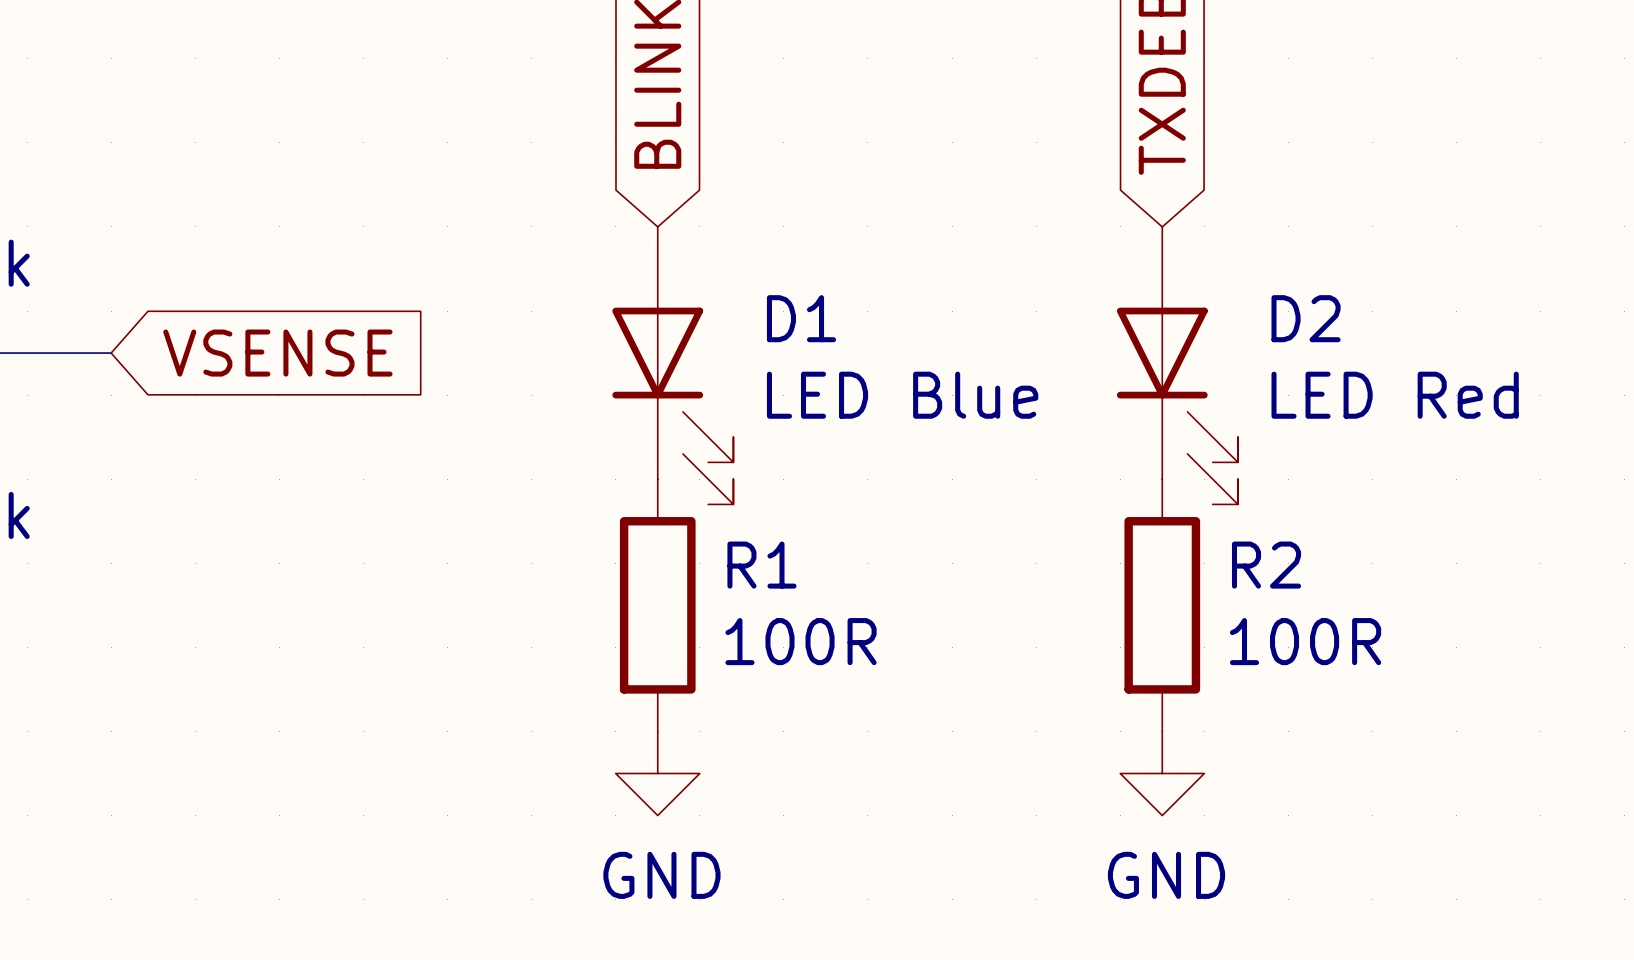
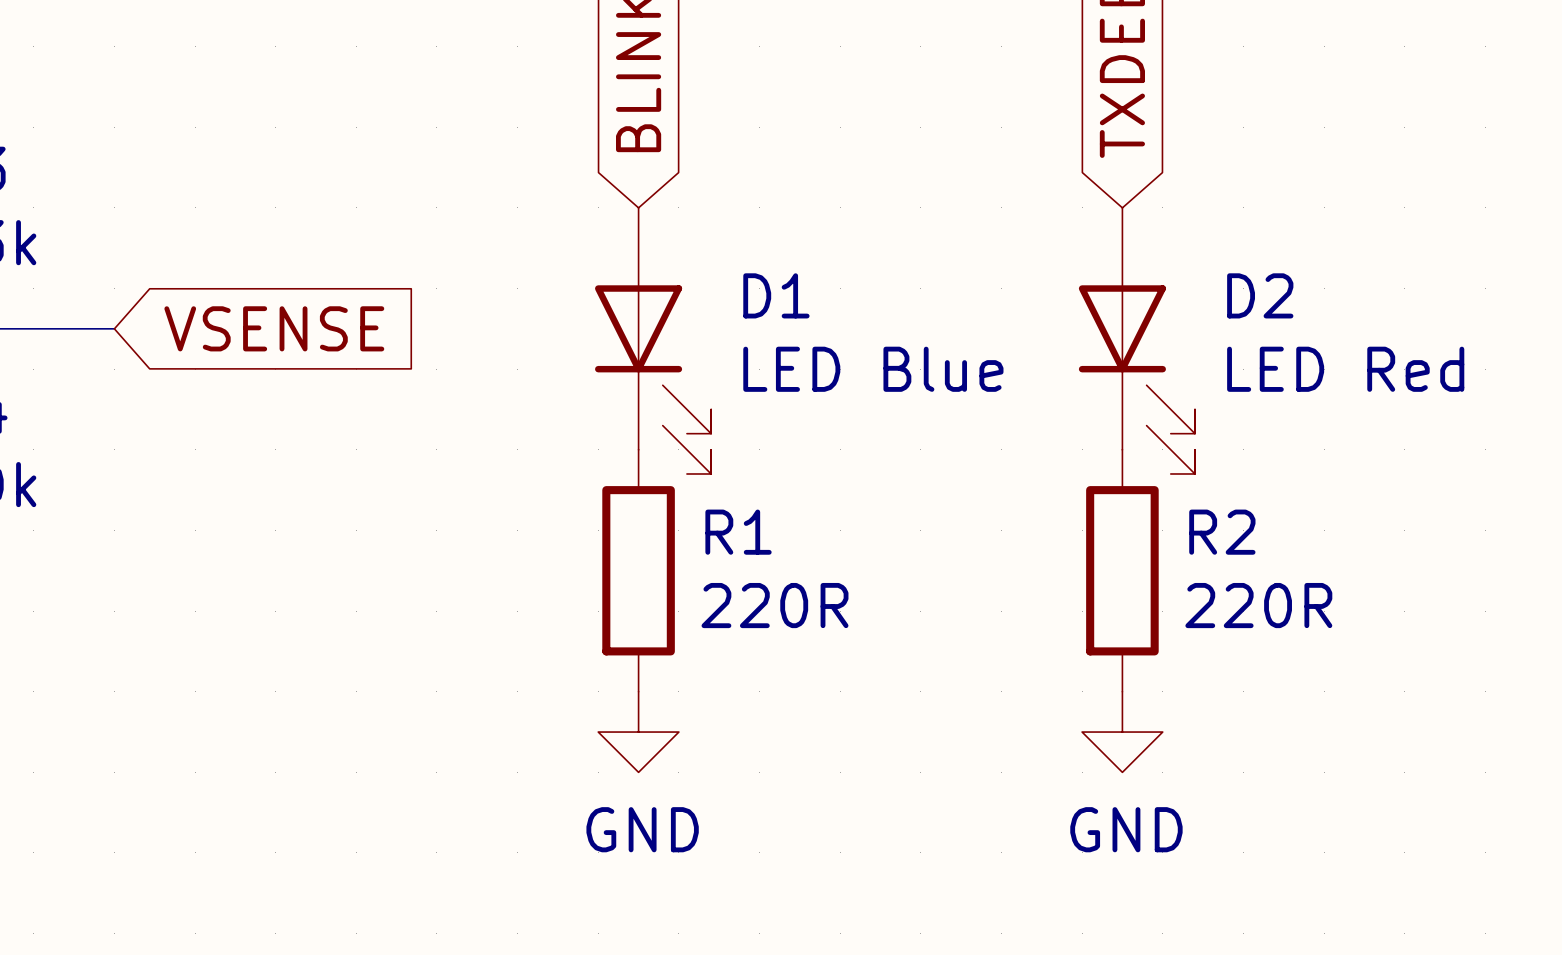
R1 value: 100R (801, 641) -> 220R (775, 605)
R2 value: 100R (1305, 641) -> 220R (1258, 605)

